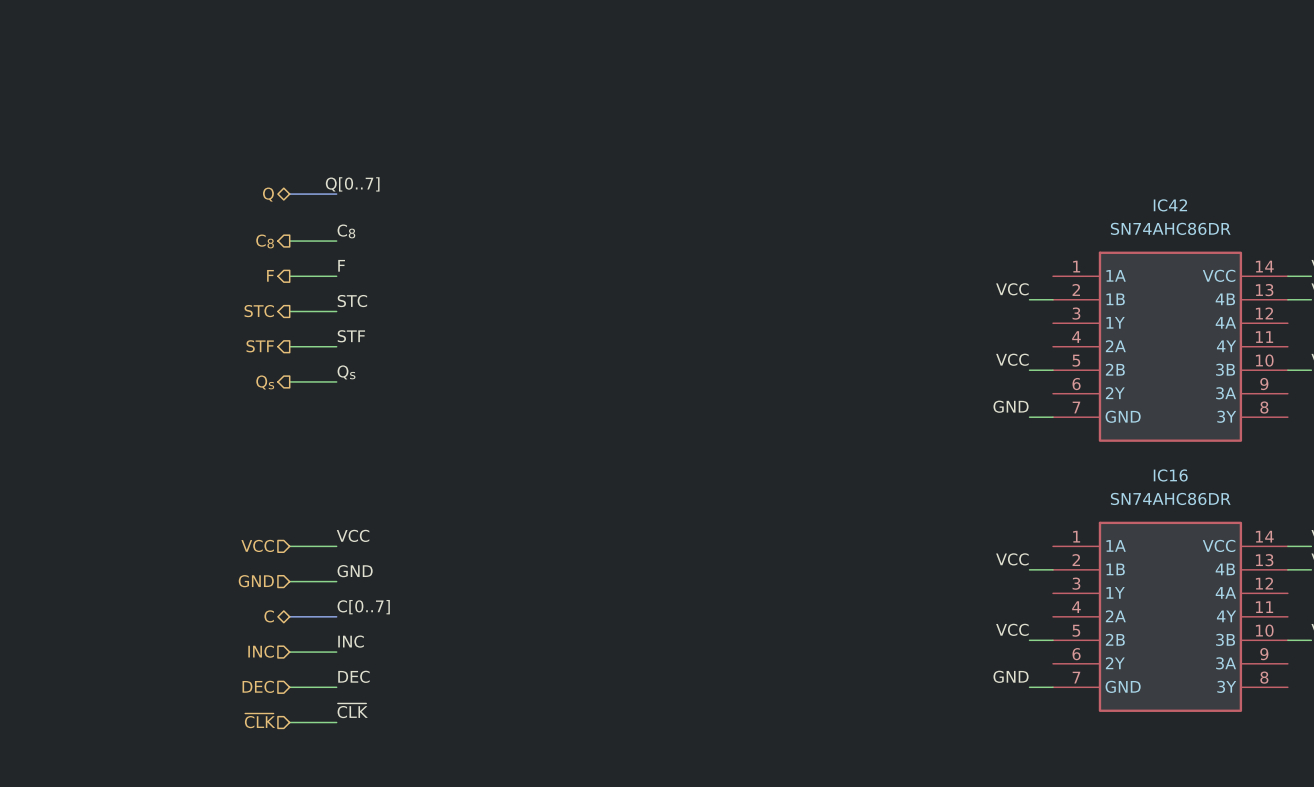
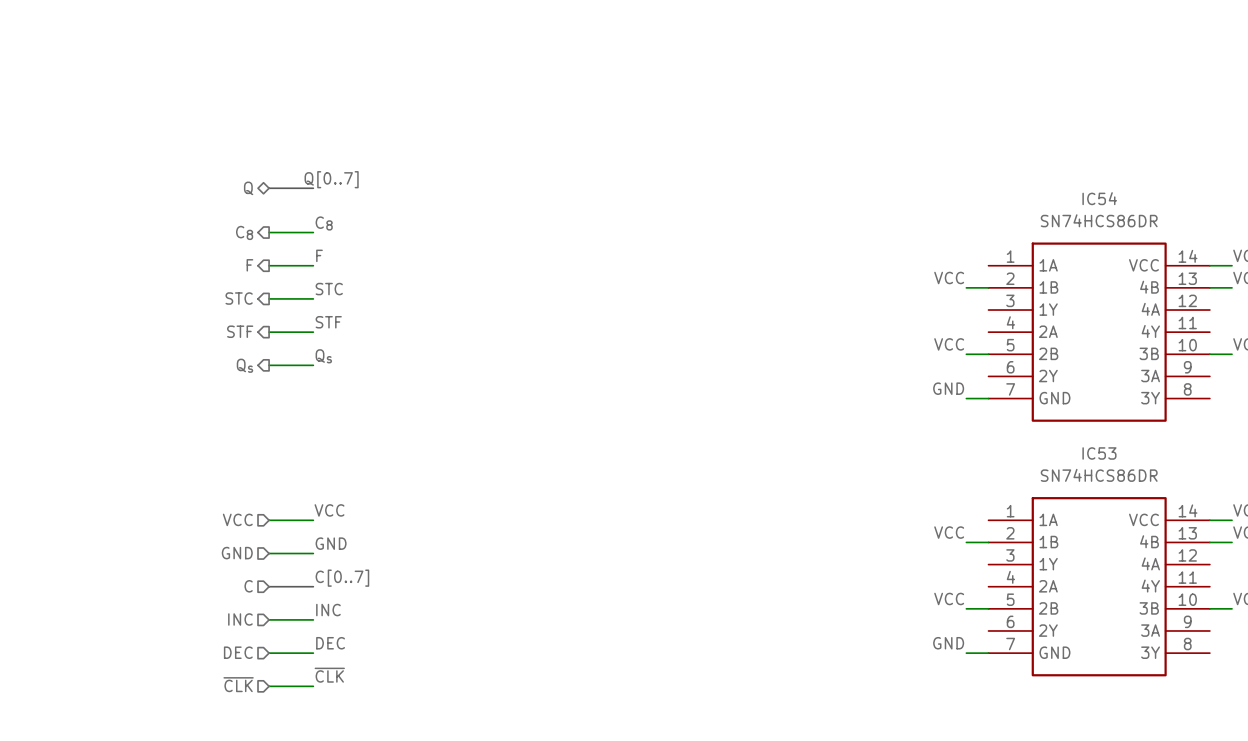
IC42 name: IC42 (1170, 205) -> IC54 (1099, 198)
IC42 value: SN74AHC86DR (1170, 228) -> SN74HCS86DR (1099, 220)
IC16 name: IC16 (1170, 475) -> IC53 (1099, 453)
IC16 value: SN74AHC86DR (1170, 498) -> SN74HCS86DR (1099, 475)
hierarchical label shape: bidirectional (269, 616) -> input (248, 586)

